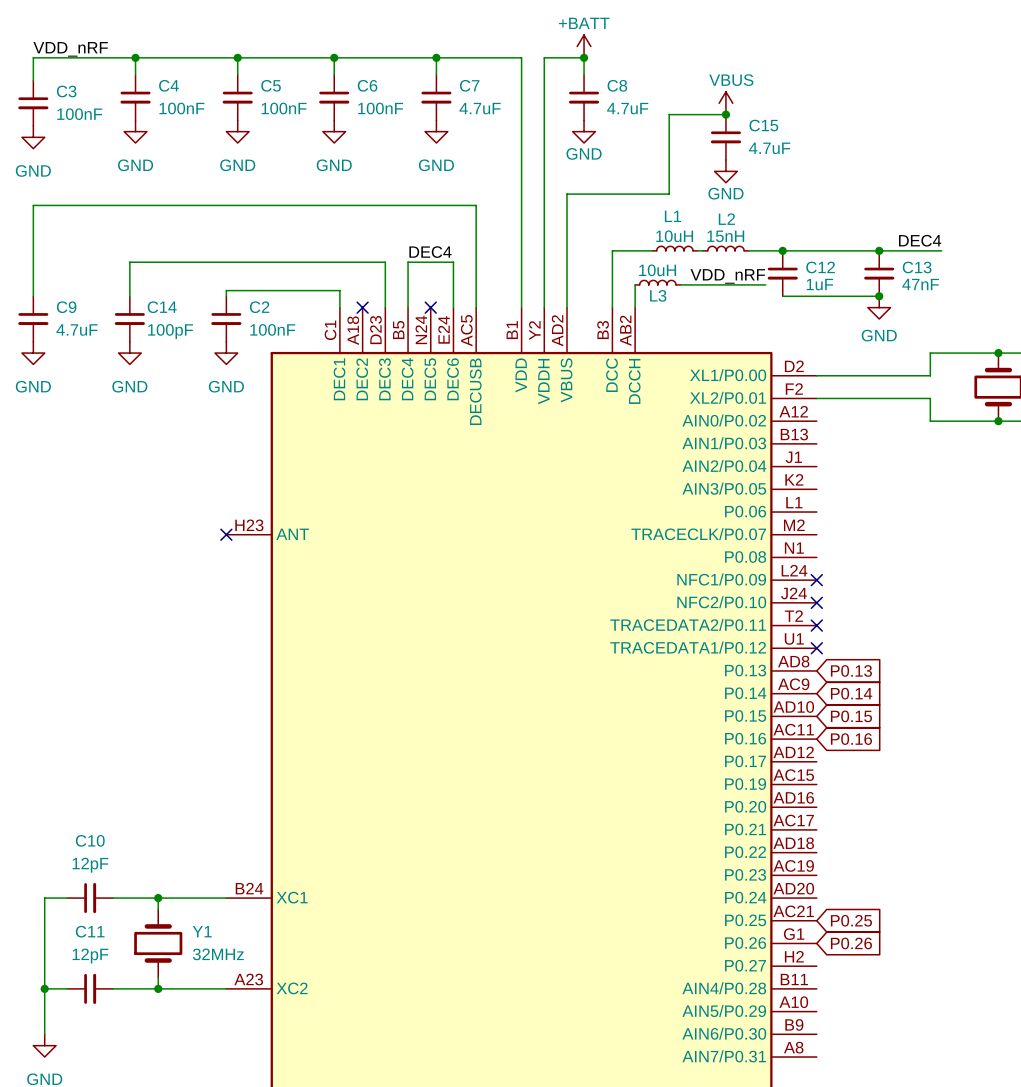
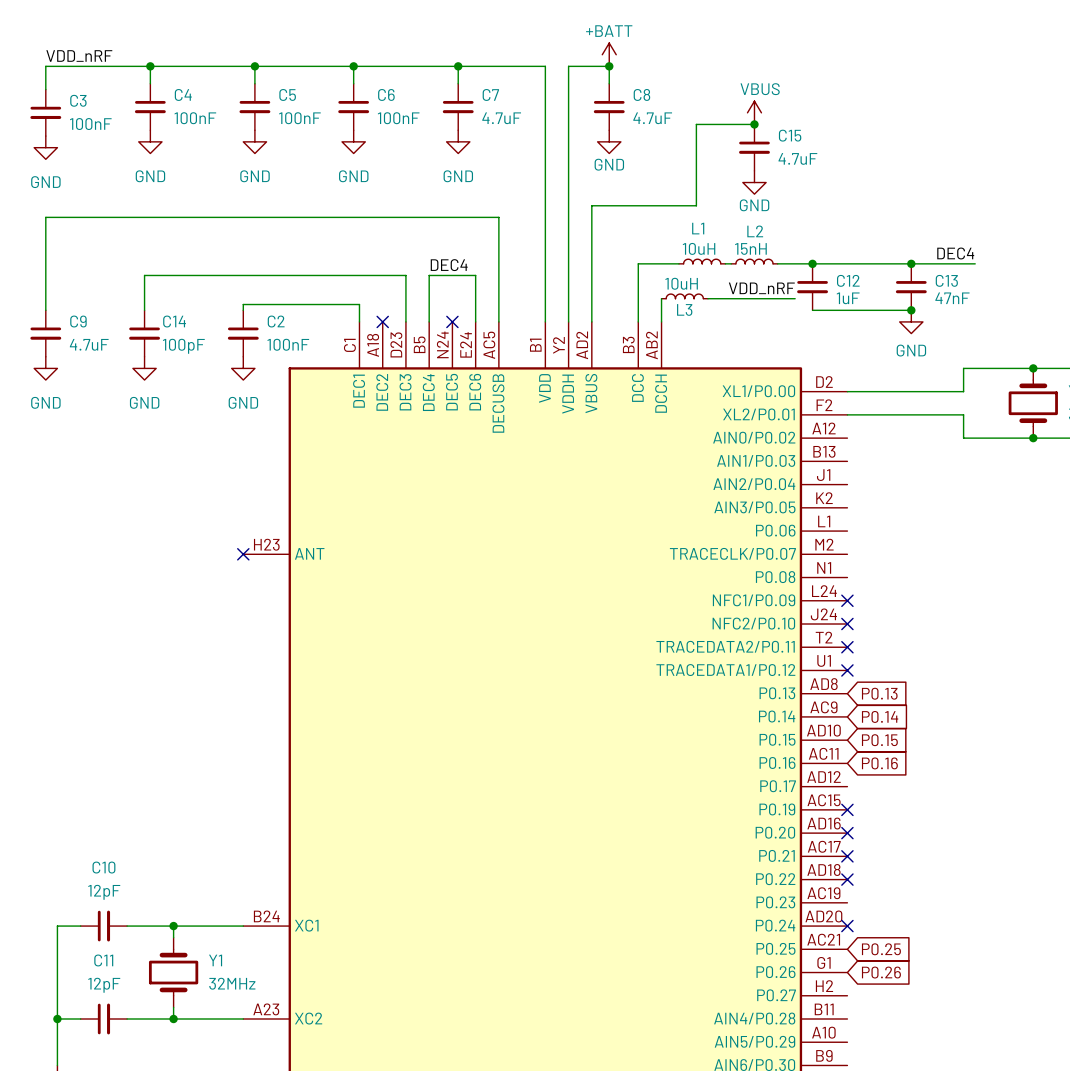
no-connect mark: none -> (847, 809)
no-connect mark: none -> (847, 833)
no-connect mark: none -> (847, 856)
no-connect mark: none -> (847, 879)
no-connect mark: none -> (847, 926)

